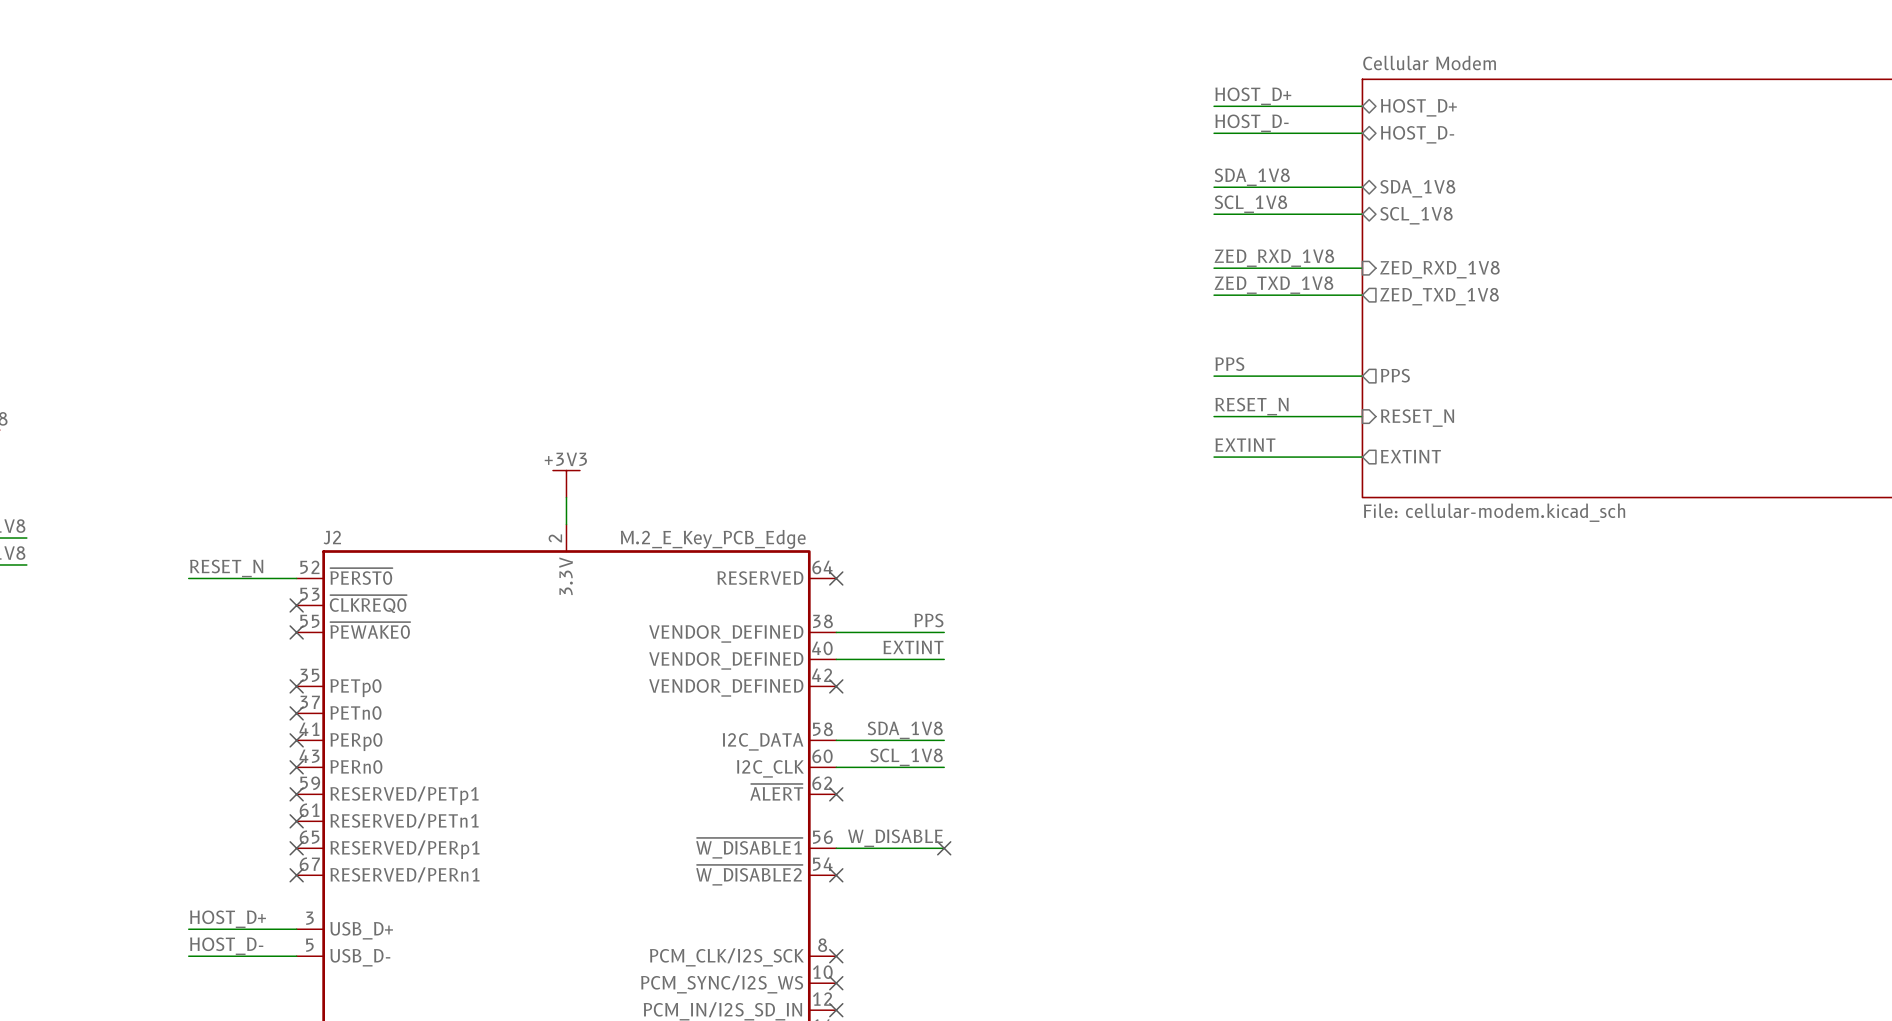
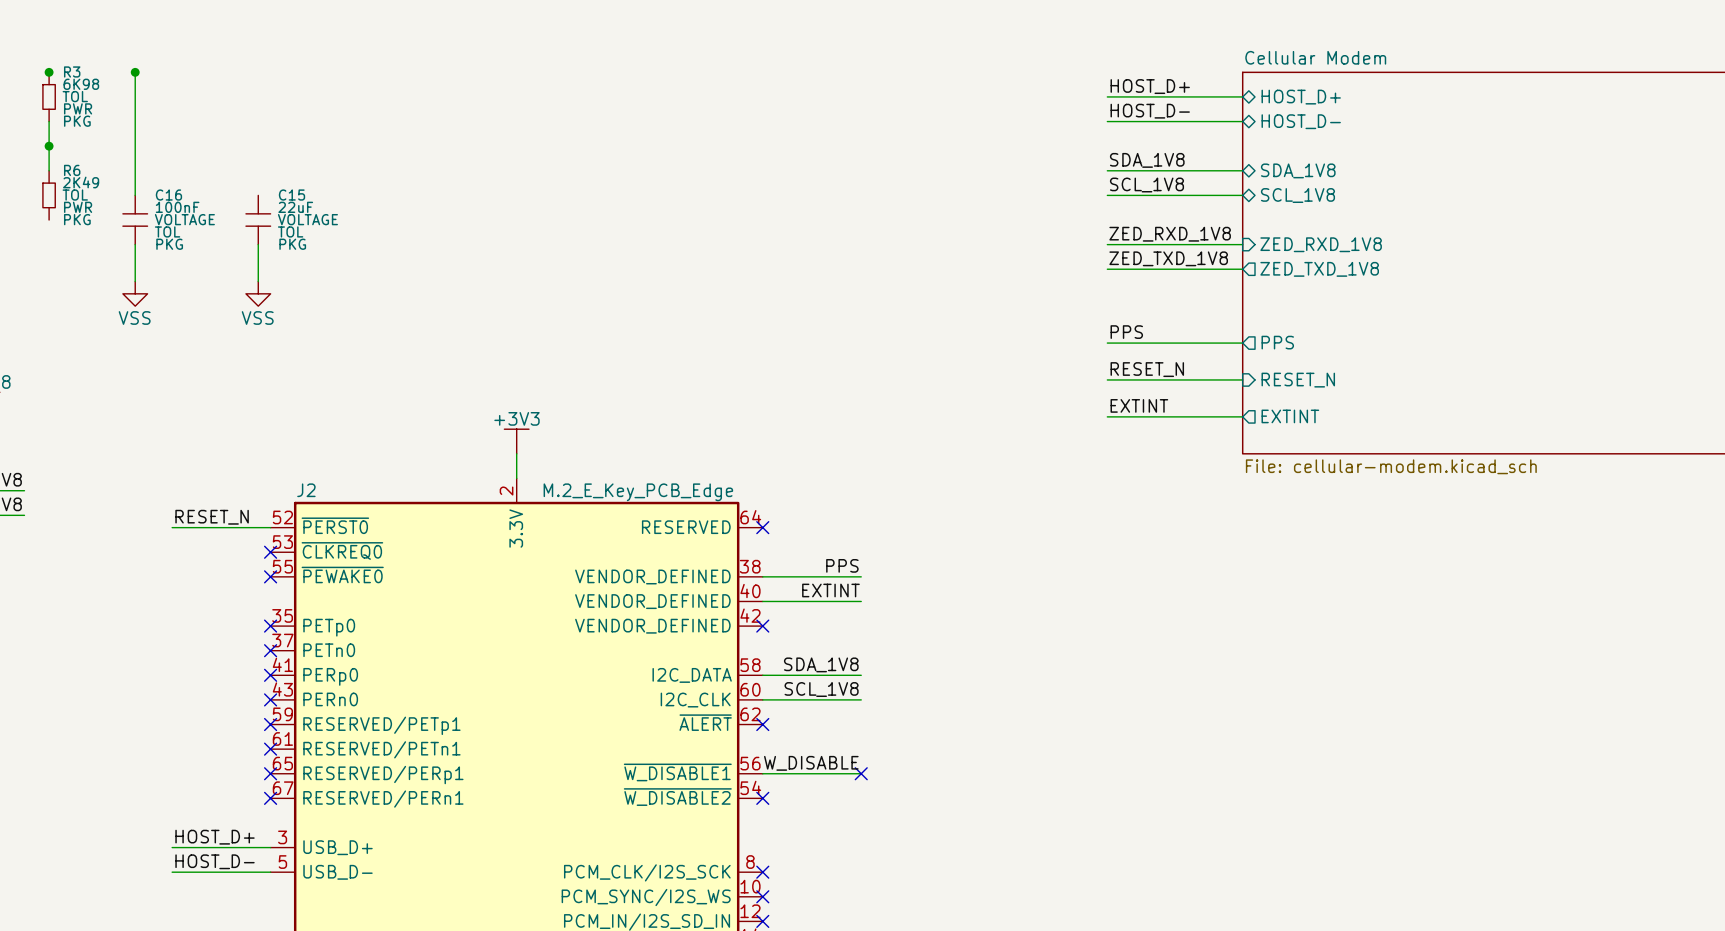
junction: none -> (49, 72)
wire: none -> (135, 72) (135, 195)
junction: none -> (135, 72)
R3: none -> 6K98 (49, 96)
wire: none -> (49, 121) (49, 170)
junction: none -> (49, 146)
R6: none -> 2K49 (49, 195)
C16: none -> 100nF (135, 220)
C15: none -> 22uF (258, 220)
wire: none -> (135, 244) (135, 281)
wire: none -> (258, 244) (258, 281)
power symbol: none -> VSS (135, 293)
power symbol: none -> VSS (258, 293)

